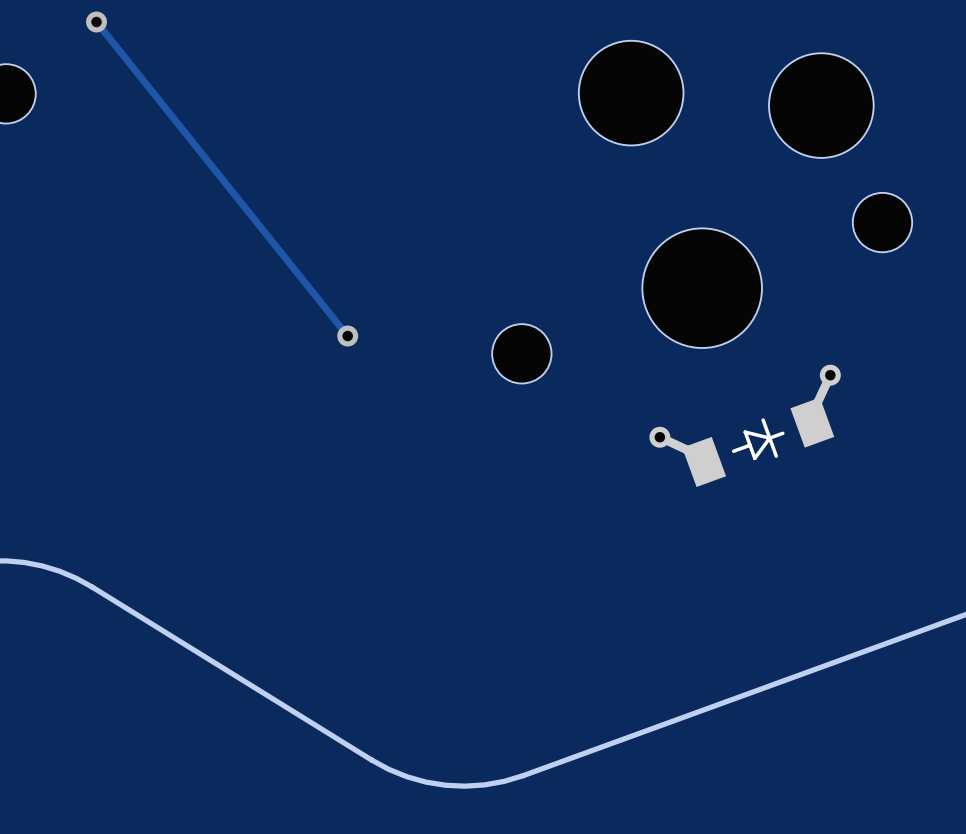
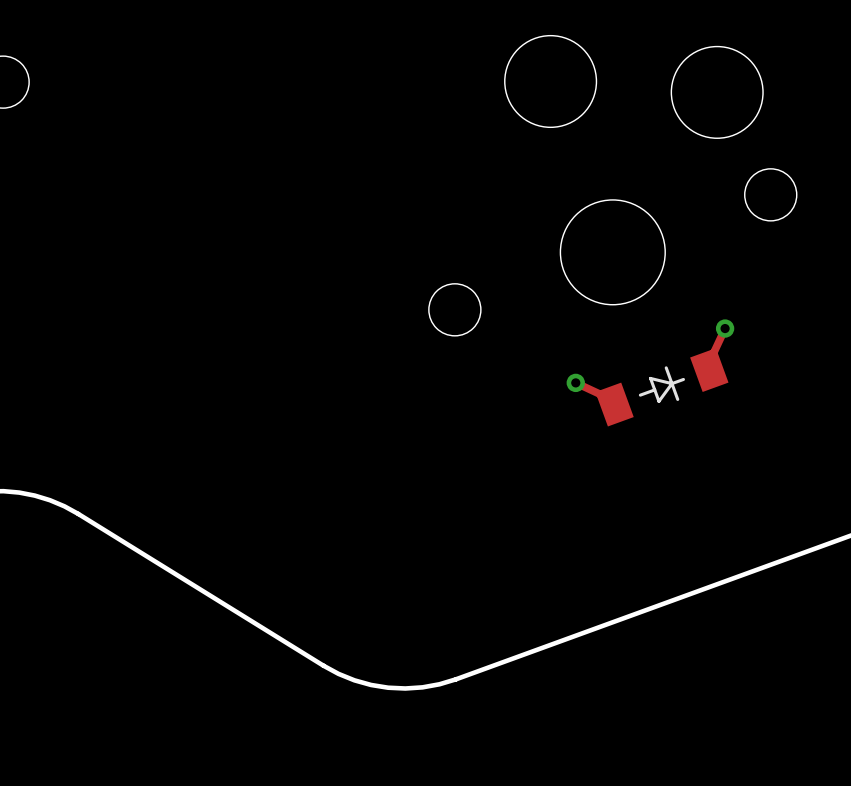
track: (96, 22) (347, 336) -> none
via: (96, 22) -> none
via: (347, 336) -> none

